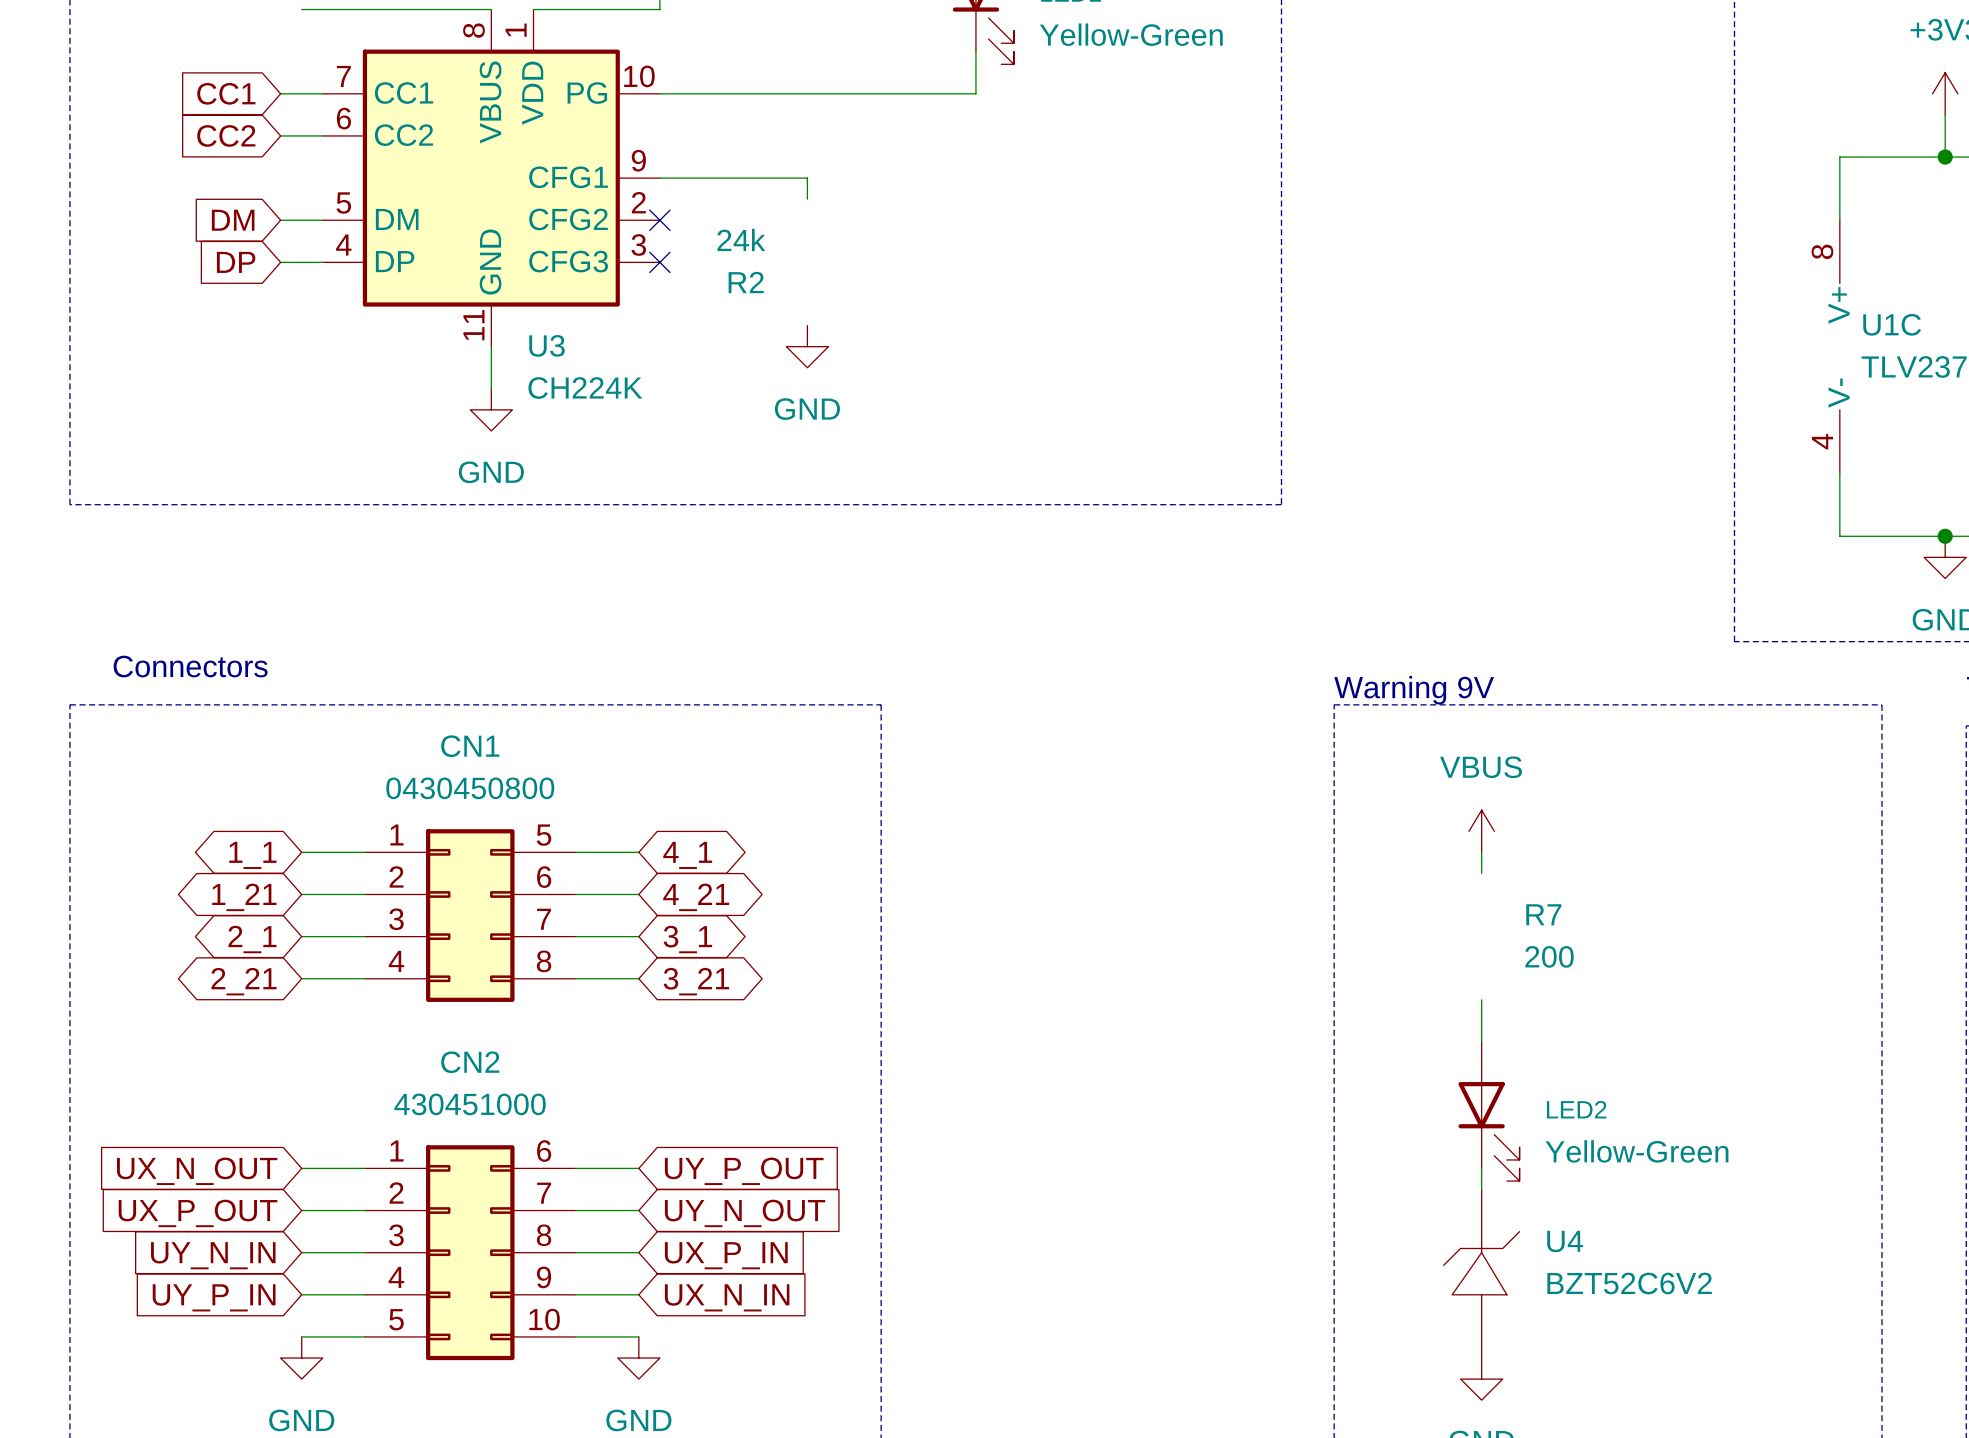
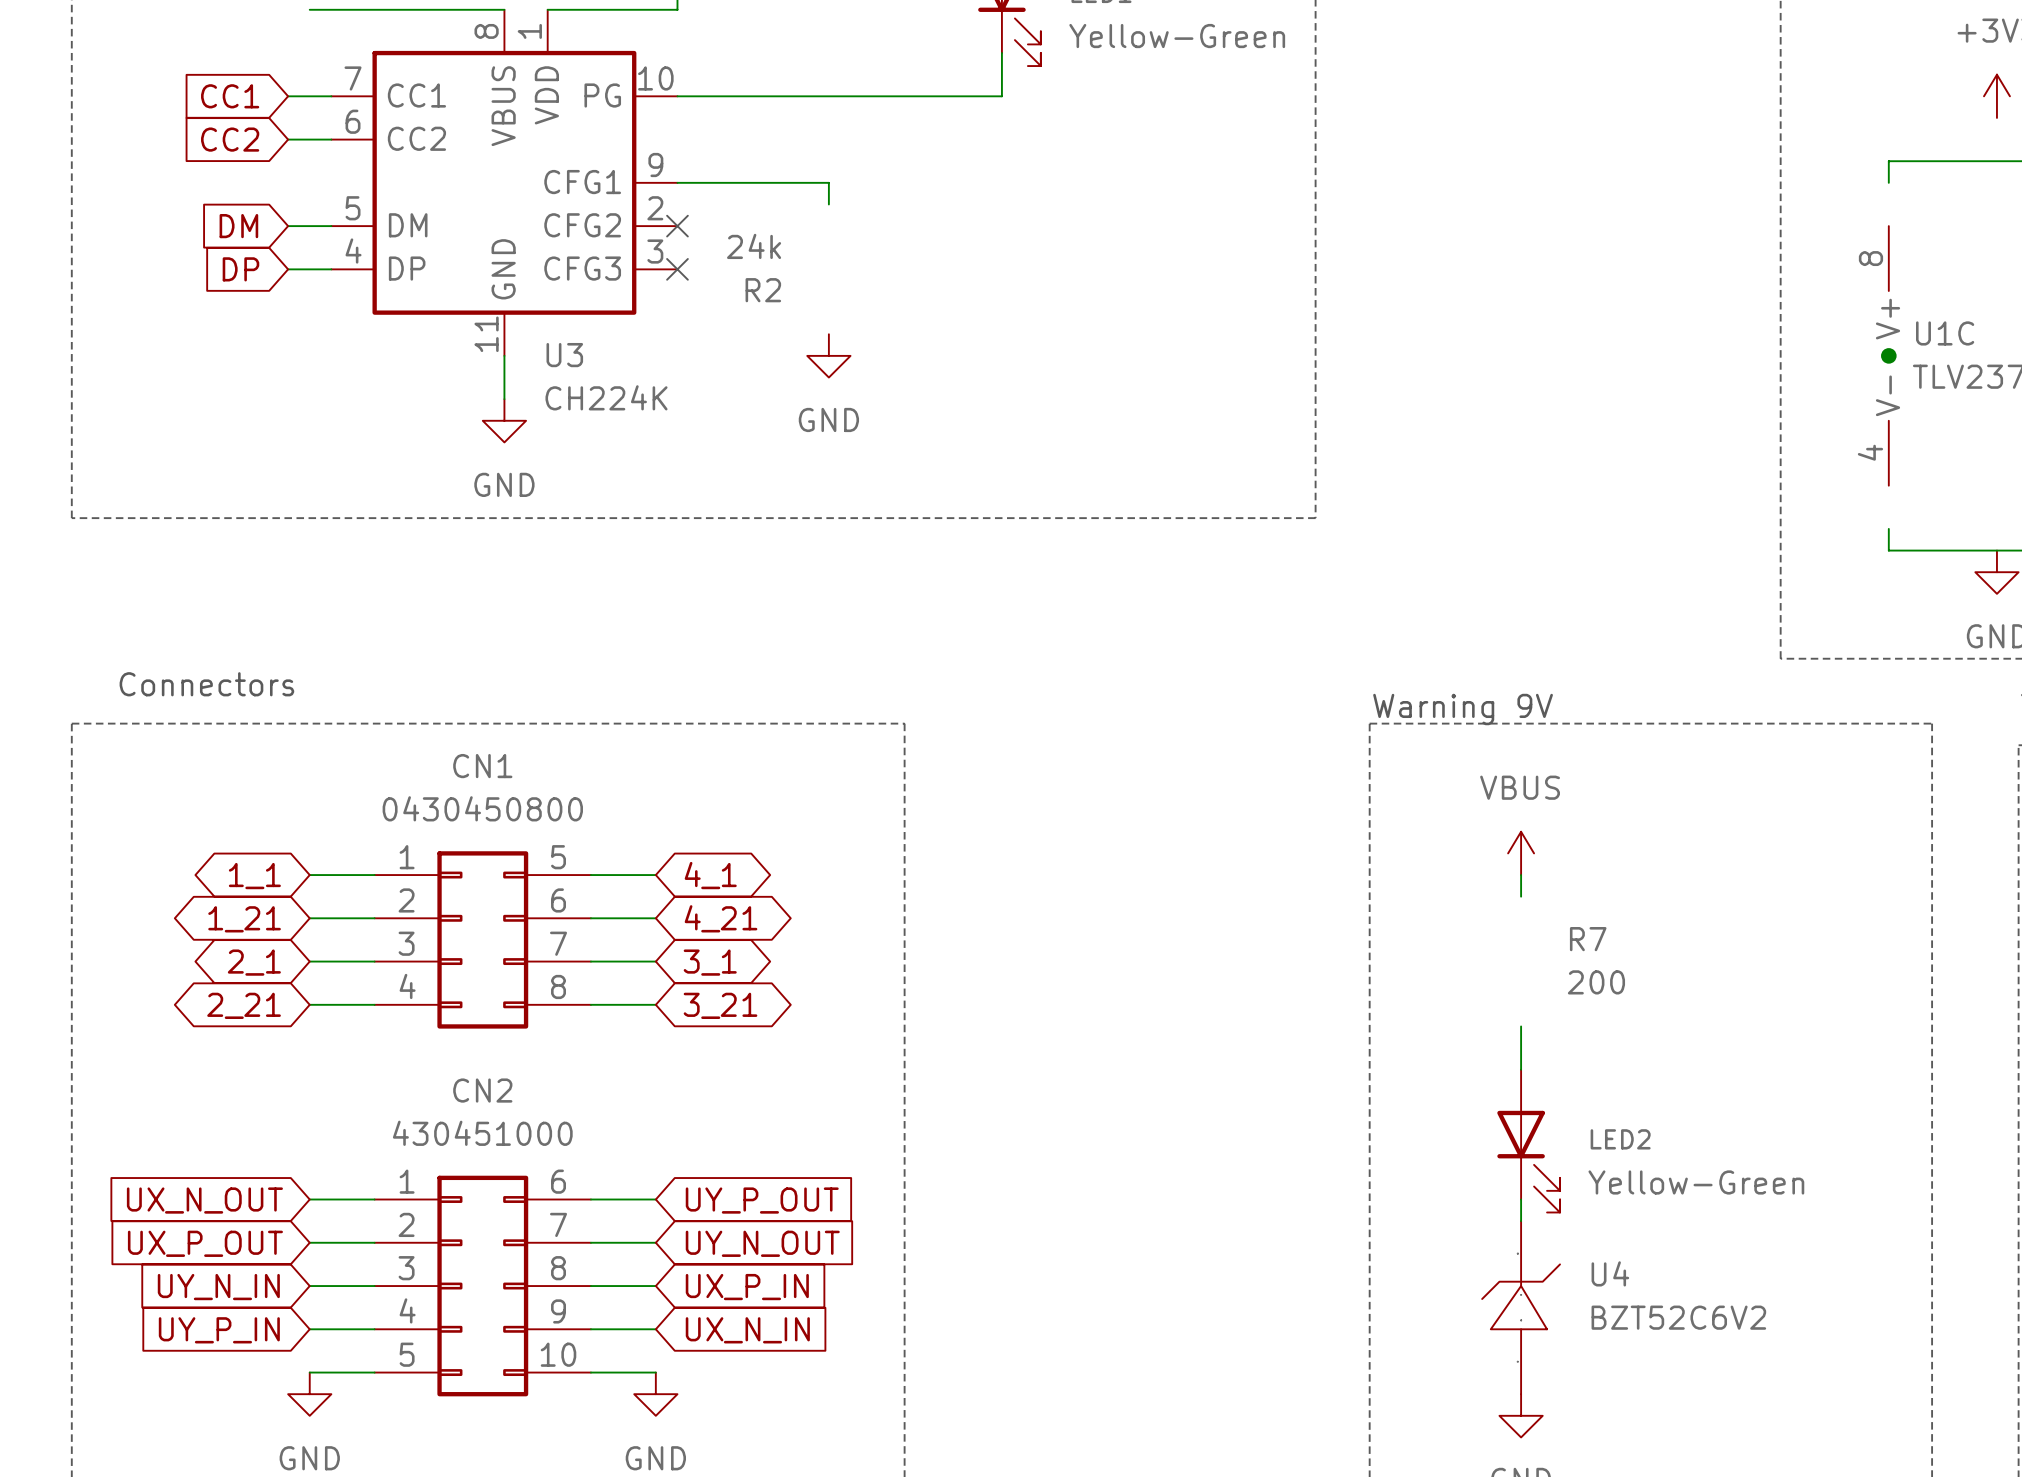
wire: (1945, 114) (1945, 157) -> none
junction: (1945, 157) -> none
wire: (1839, 178) (1839, 220) -> none
junction: none -> (1888, 355)
wire: (1839, 473) (1839, 515) -> none
junction: (1945, 536) -> none

